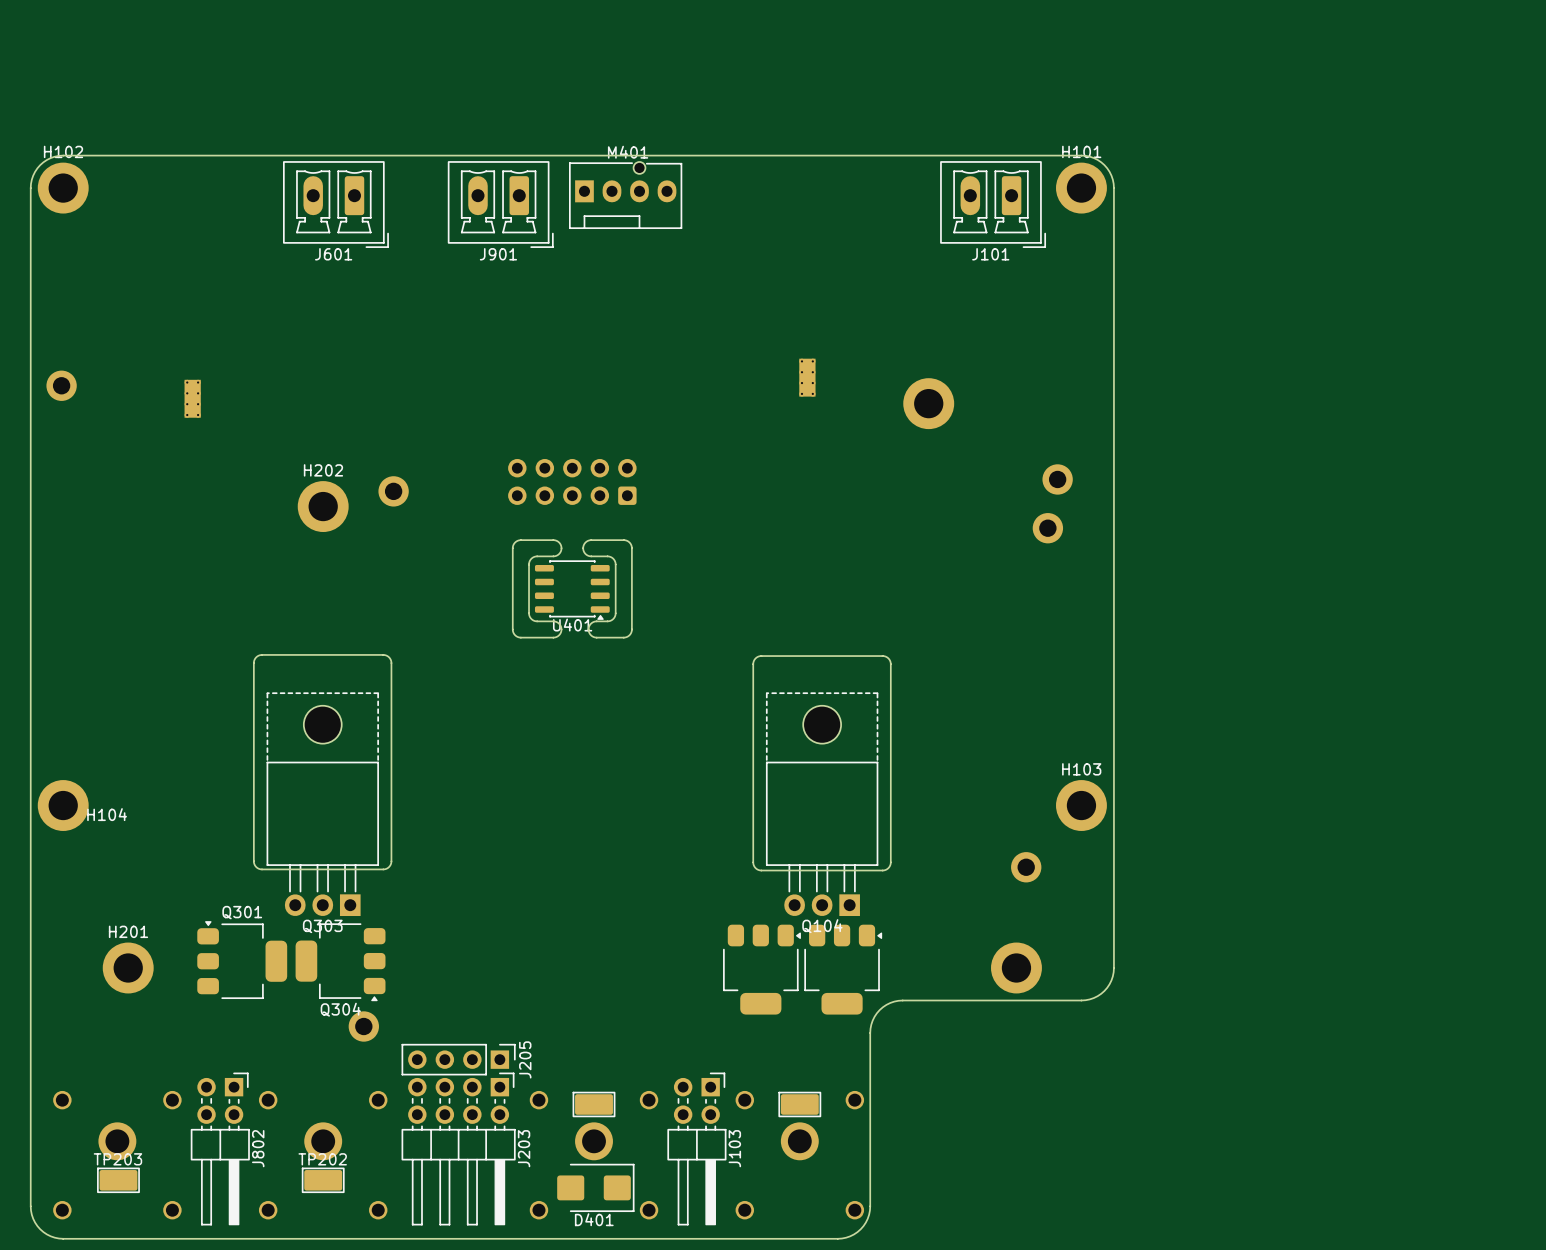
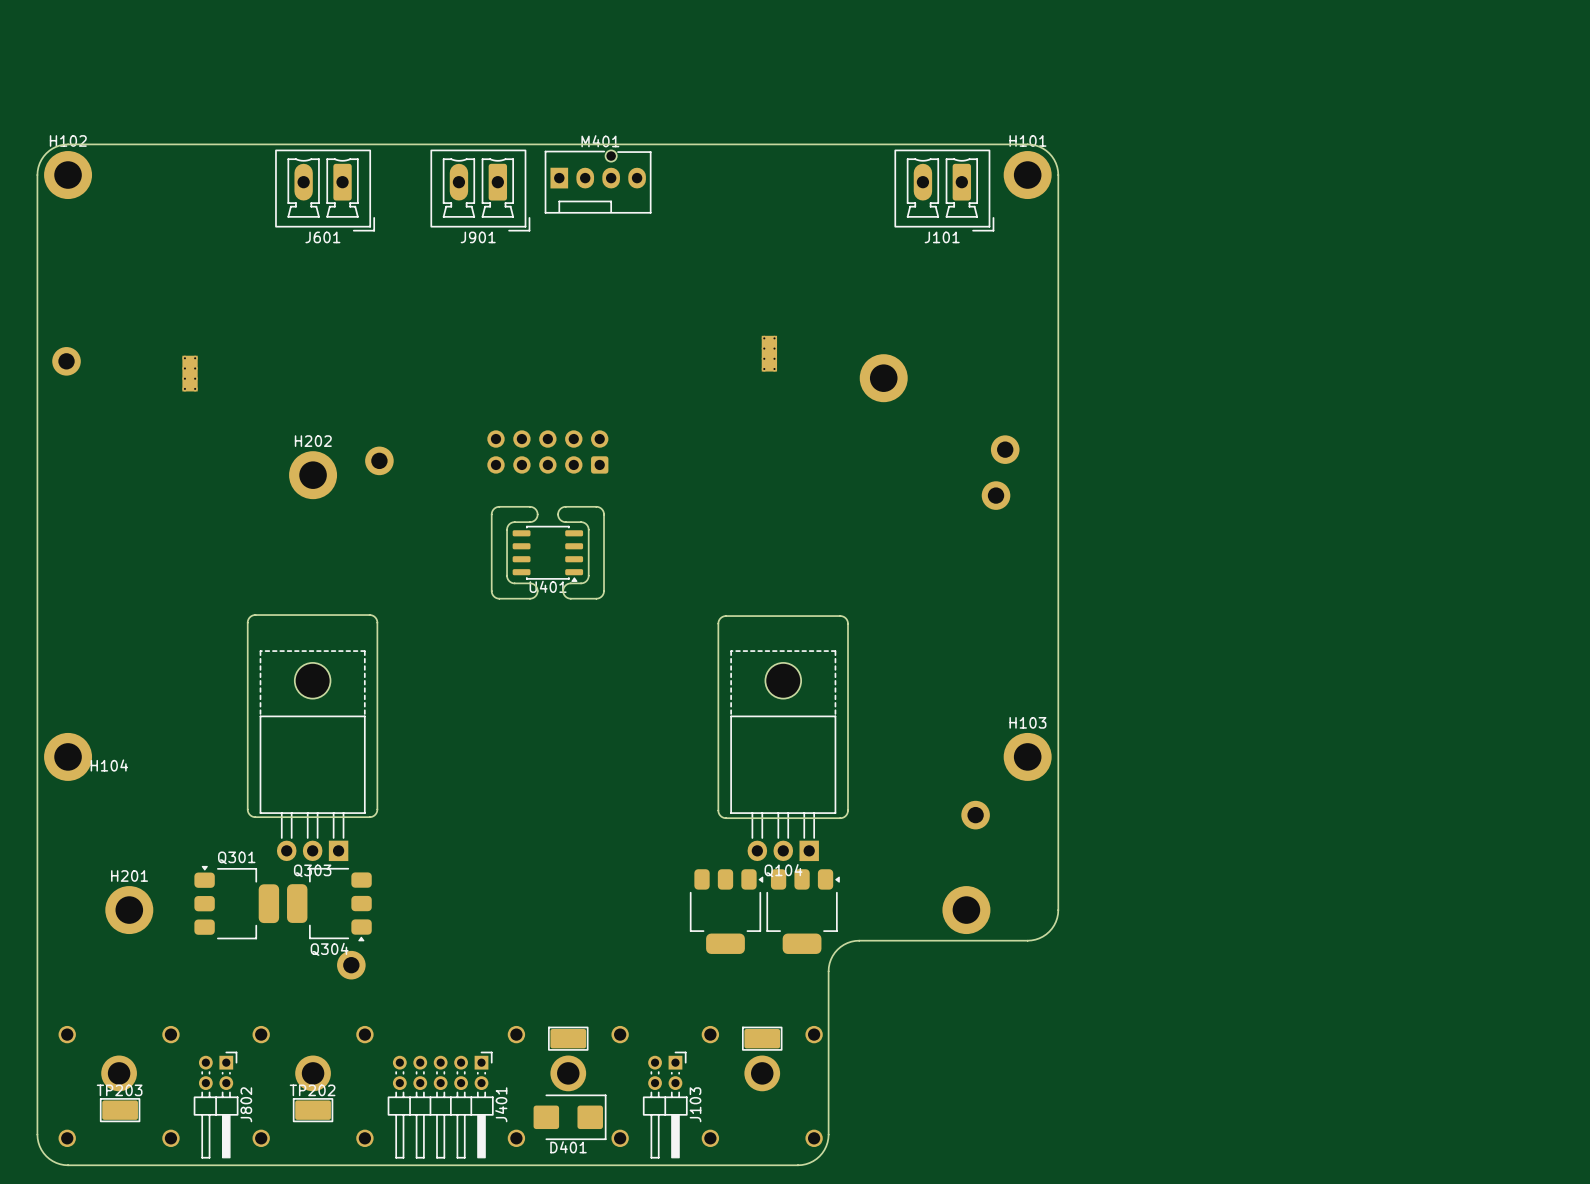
J205: (458, 1059) -> none
J802 footprint: [190, 1072, 250, 1226] -> [193, 1051, 239, 1159]
J103 footprint: [667, 1072, 727, 1226] -> [643, 1051, 688, 1159]
J203: (458, 1149) -> none
J401: none -> (440, 1105)

